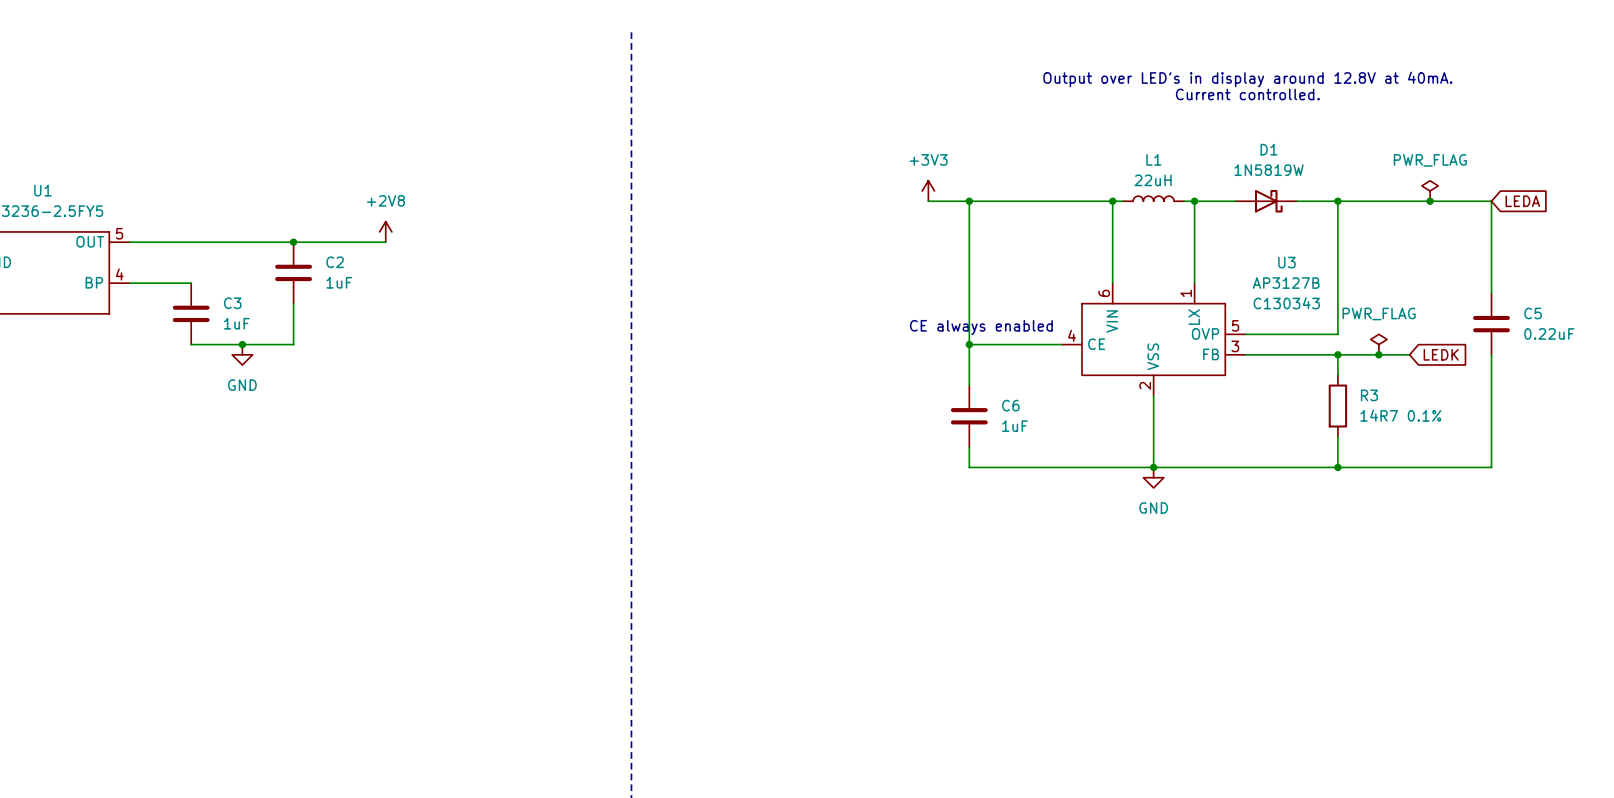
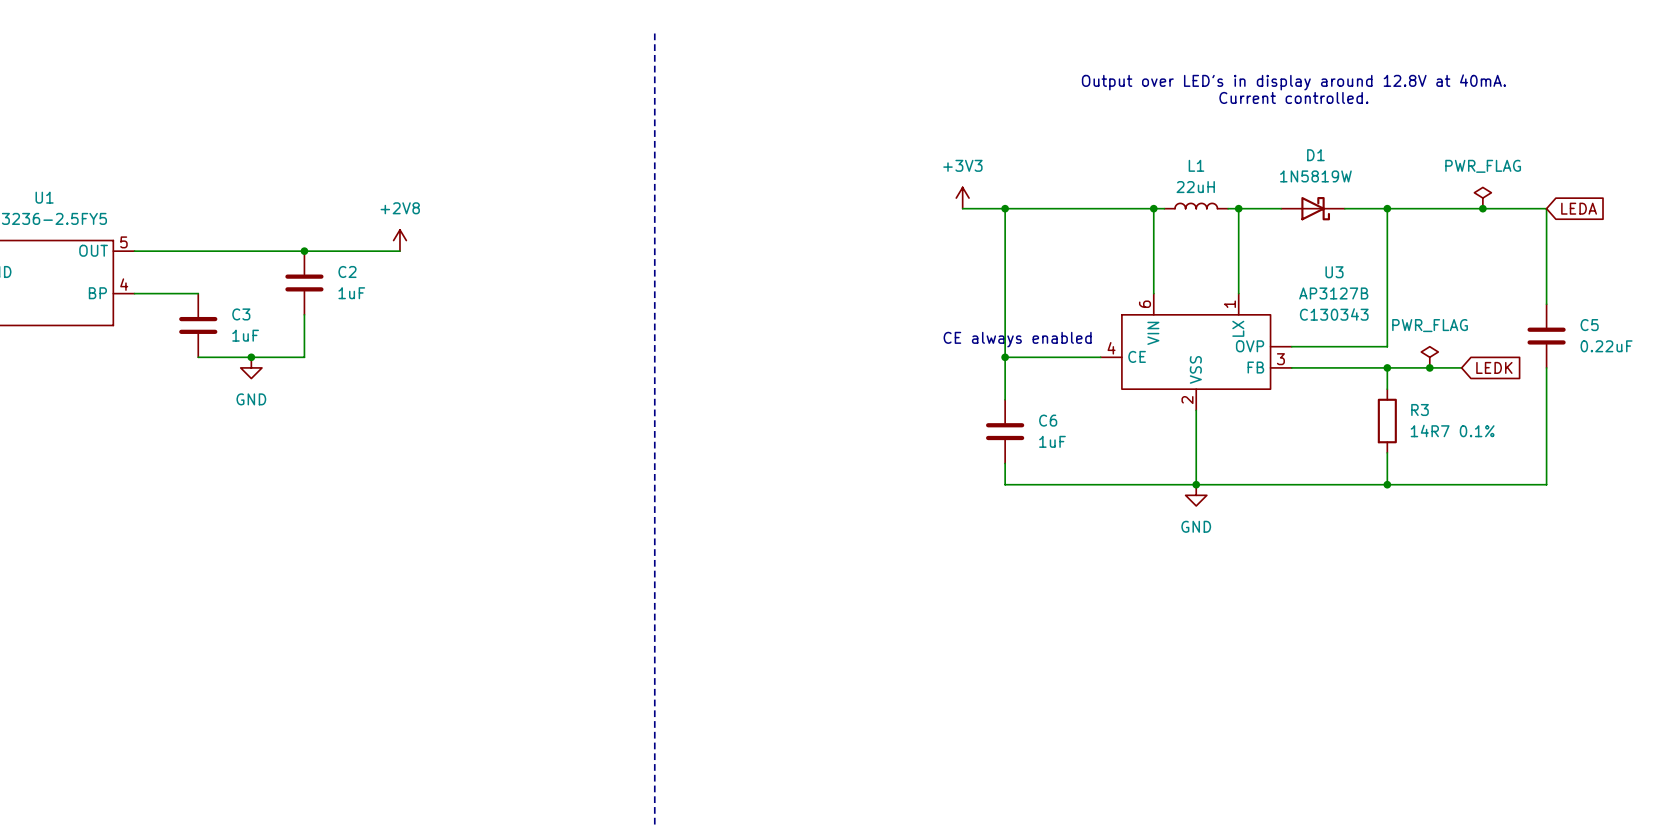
U3 pin number: 5 (1235, 325) -> none

